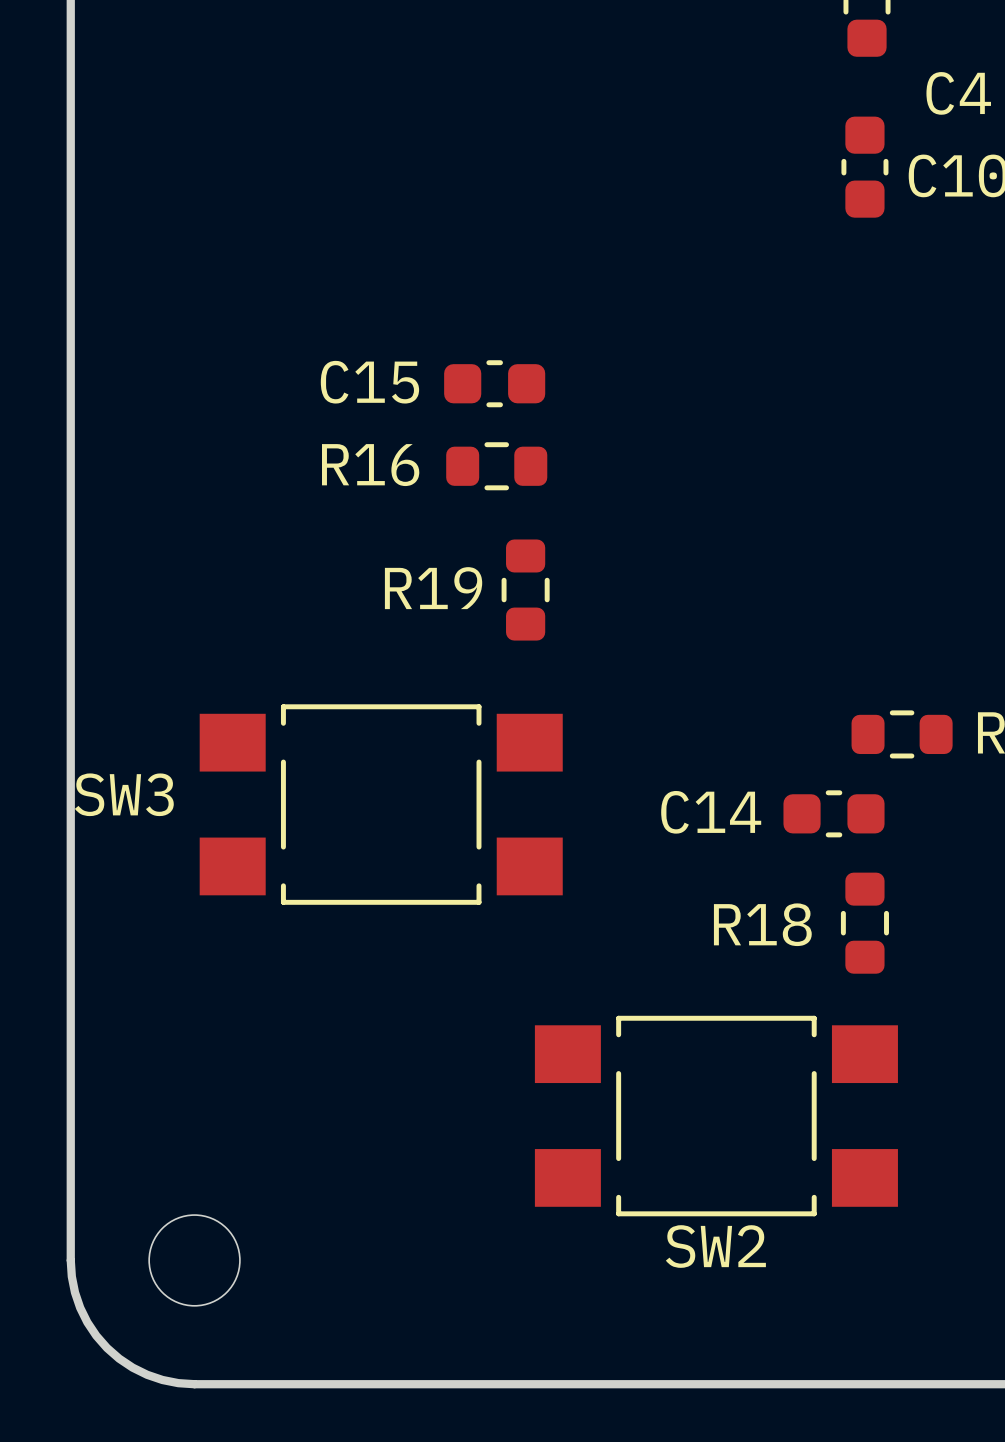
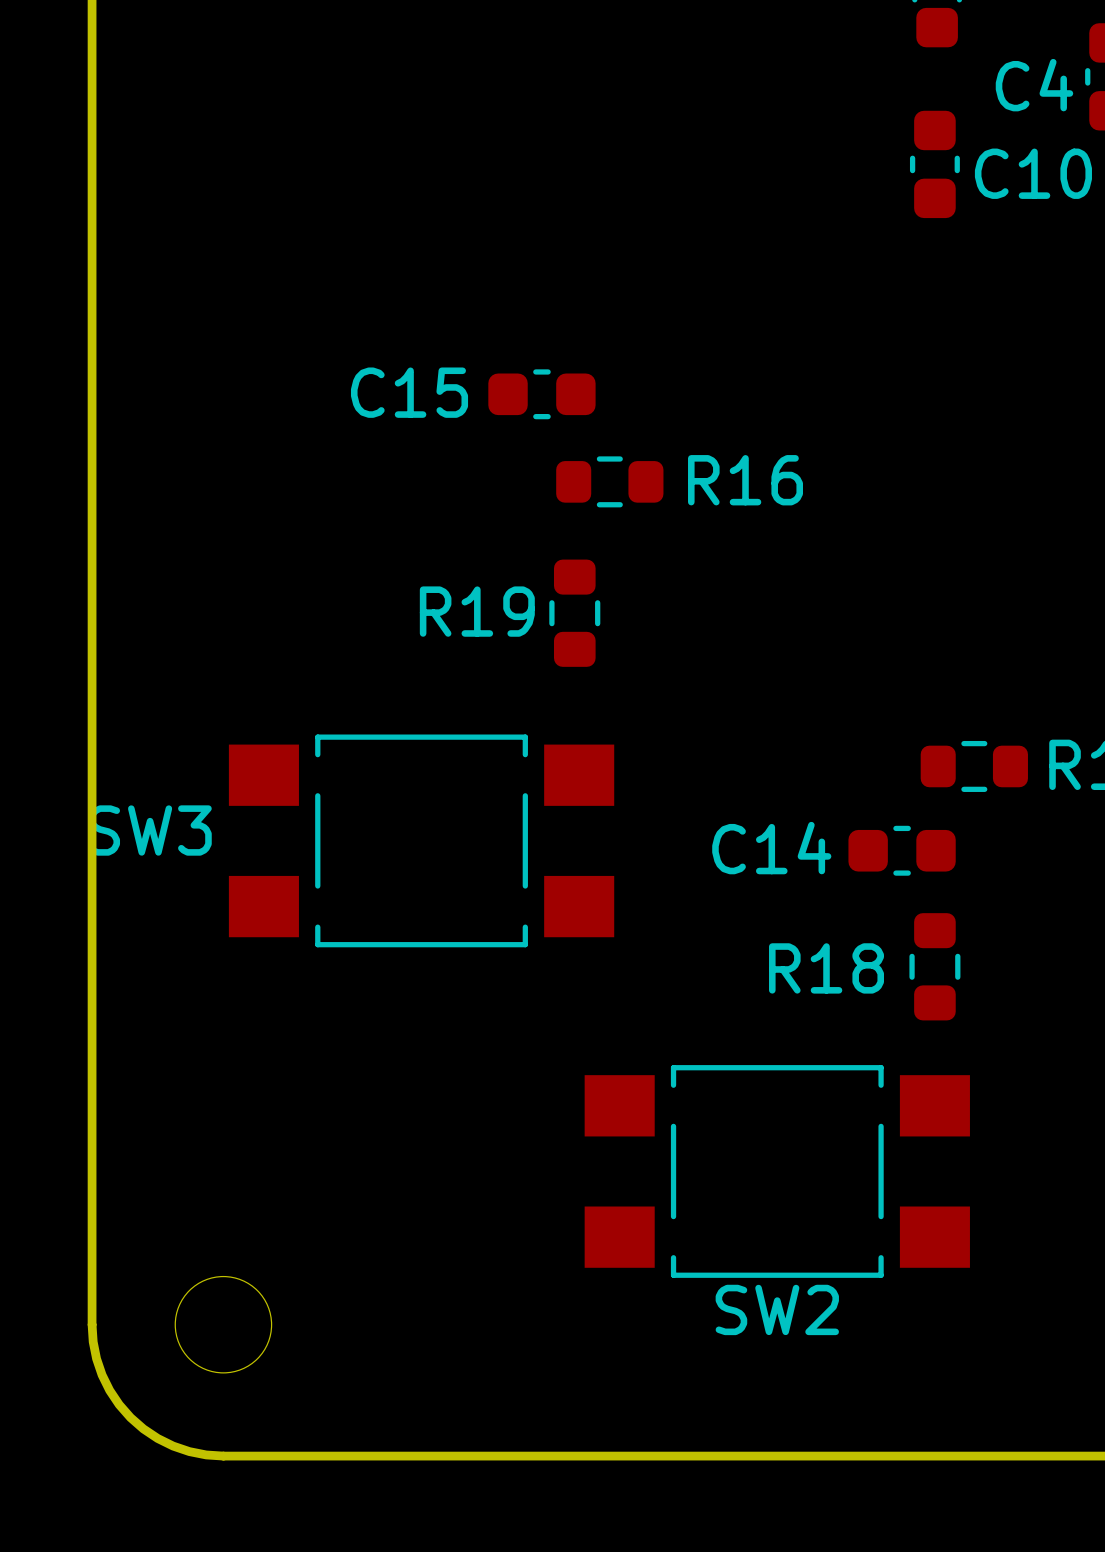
R16 name position: R16 (370, 465) -> R16 (745, 480)
R16 position: (496, 466) -> (609, 481)

